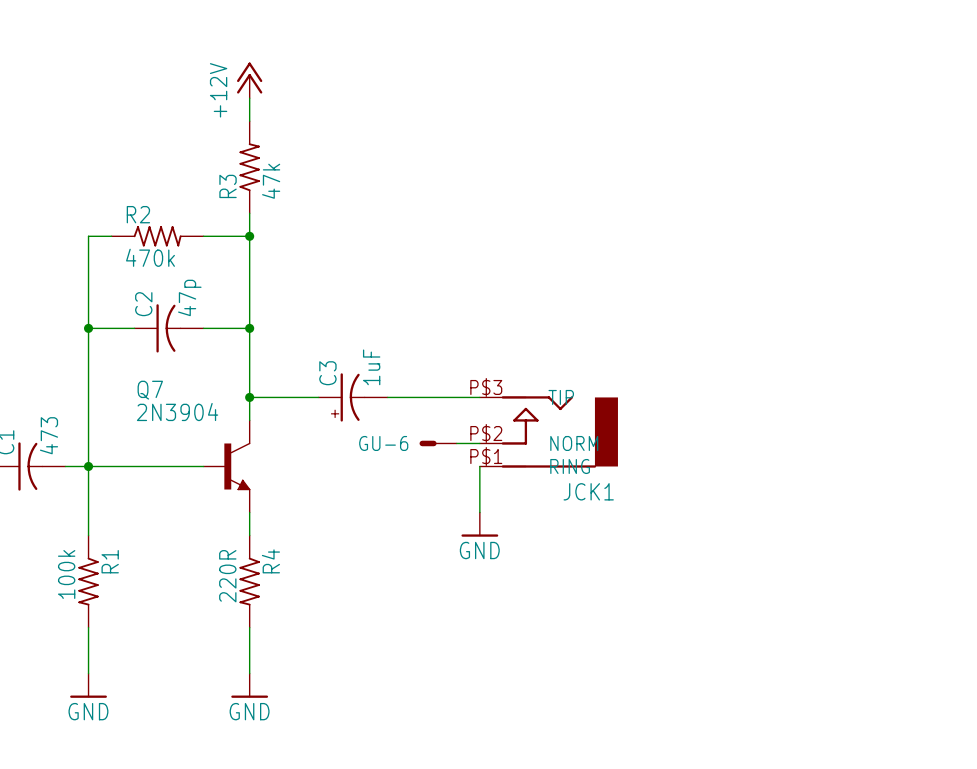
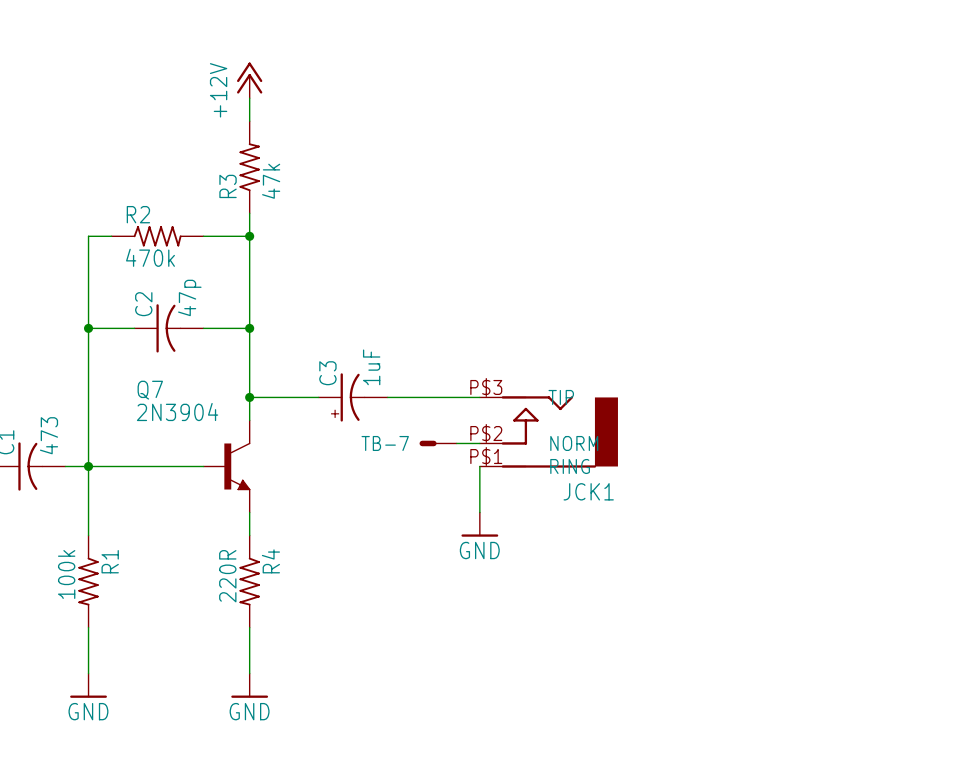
GU-6 name: GU-6 (383, 443) -> TB-7 (385, 443)

